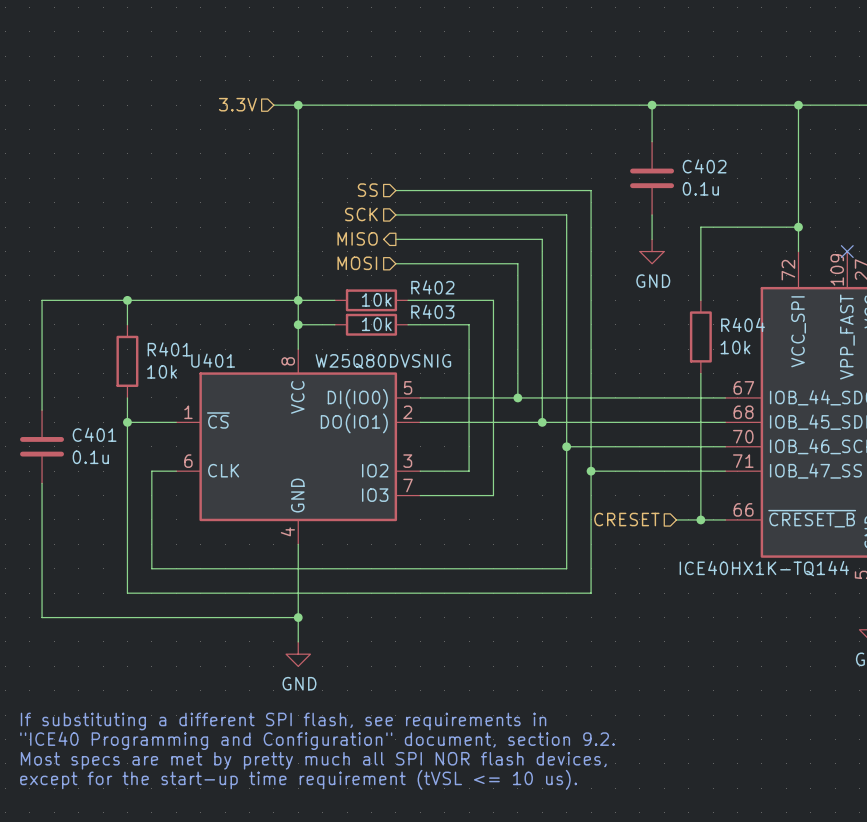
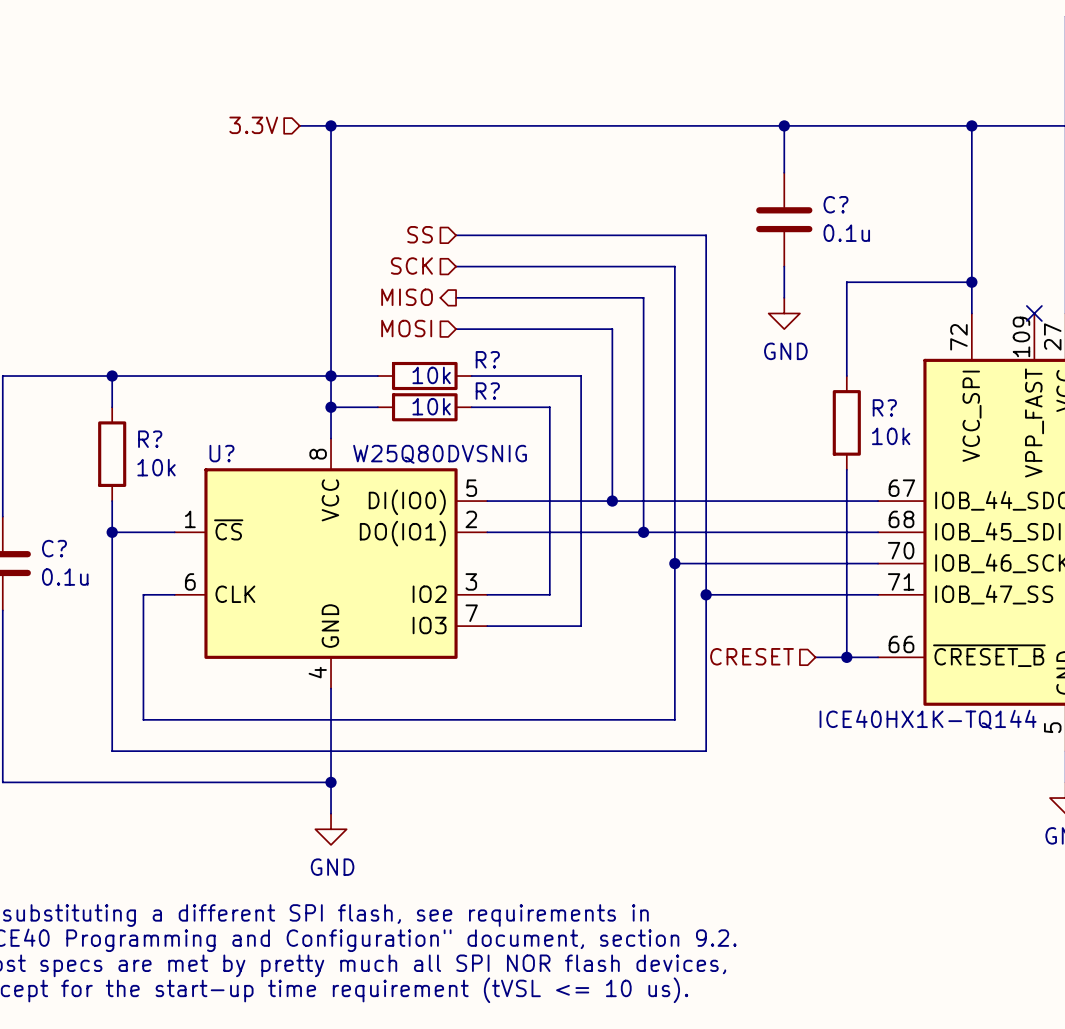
C402 name: C402 (704, 166) -> C? (835, 204)
R402 name: R402 (432, 287) -> R? (487, 359)
R403 name: R403 (432, 311) -> R? (487, 391)
R404 name: R404 (743, 324) -> R? (884, 407)
R401 name: R401 (169, 349) -> R? (150, 439)
U401 name: U401 (213, 360) -> U? (221, 453)
C401 name: C401 (94, 434) -> C? (54, 548)

